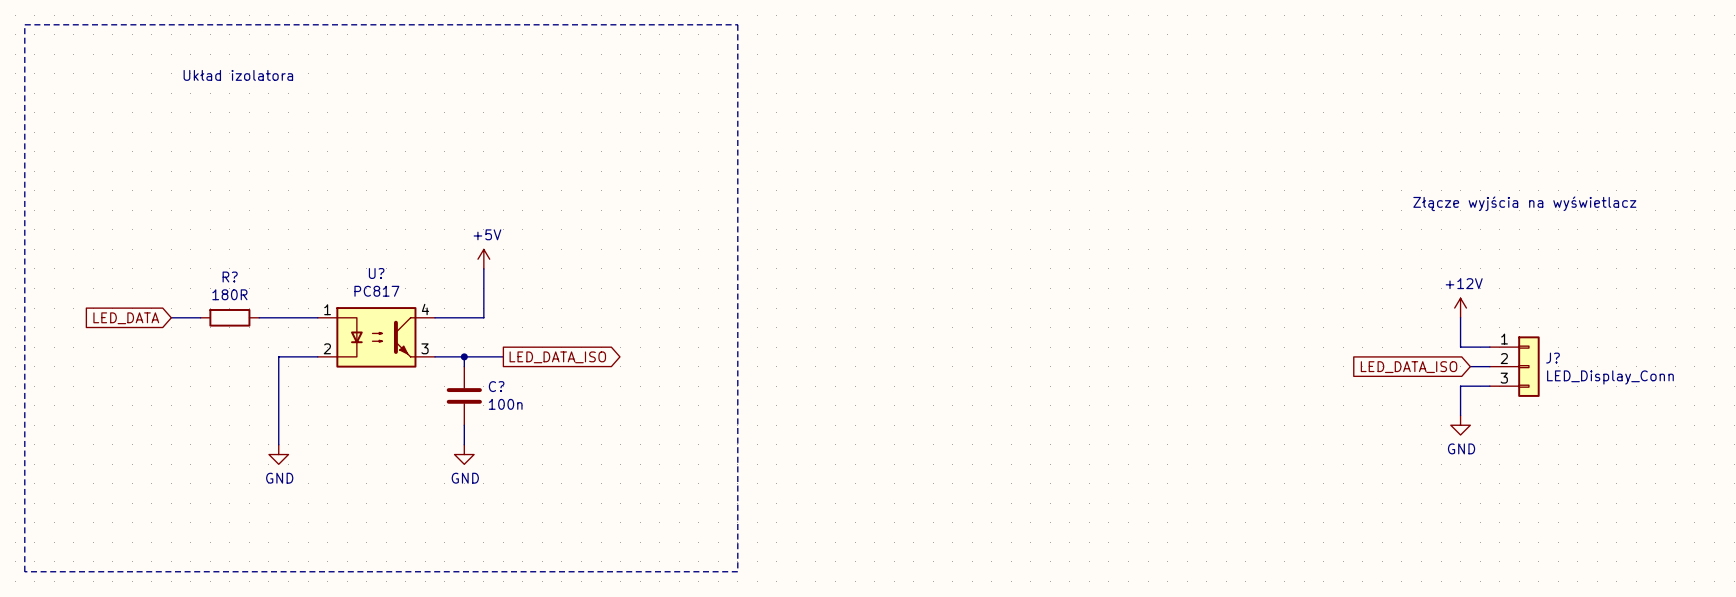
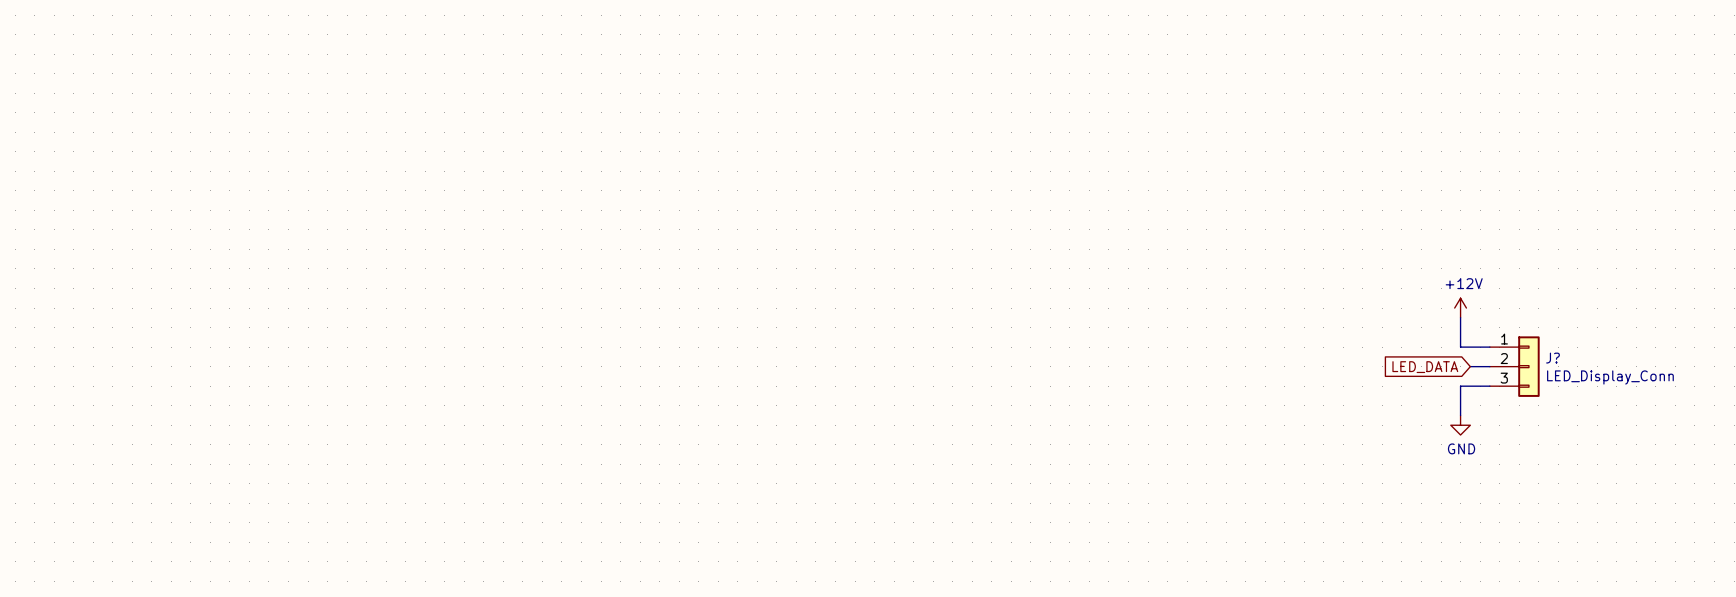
line: (24, 24) (737, 24) (737, 571) (24, 571) (24, 24) -> none
text: Układ izolatora (238, 75) -> none
text: Złącze wyjścia na wyświetlacz (1524, 203) -> none
power symbol: +5V (483, 259) -> none
wire: (483, 268) (483, 317) (435, 317) -> none
wire: (171, 317) (200, 317) -> none
R?: 180R (229, 317) -> none
wire: (259, 317) (317, 317) -> none
global label: LED_DATA (126, 318) -> none
U?: PC817 (376, 337) -> none
wire: (317, 356) (278, 356) (278, 444) -> none
wire: (435, 356) (503, 356) -> none
wire: (464, 356) (464, 366) -> none
junction: (464, 356) -> none
global label: LED_DATA_ISO (557, 357) -> none
global label: LED_DATA_ISO (1409, 367) -> LED_DATA (1425, 367)
C?: 100n (464, 395) -> none
wire: (464, 425) (464, 444) -> none
power symbol: GND (278, 454) -> none
power symbol: GND (464, 454) -> none

